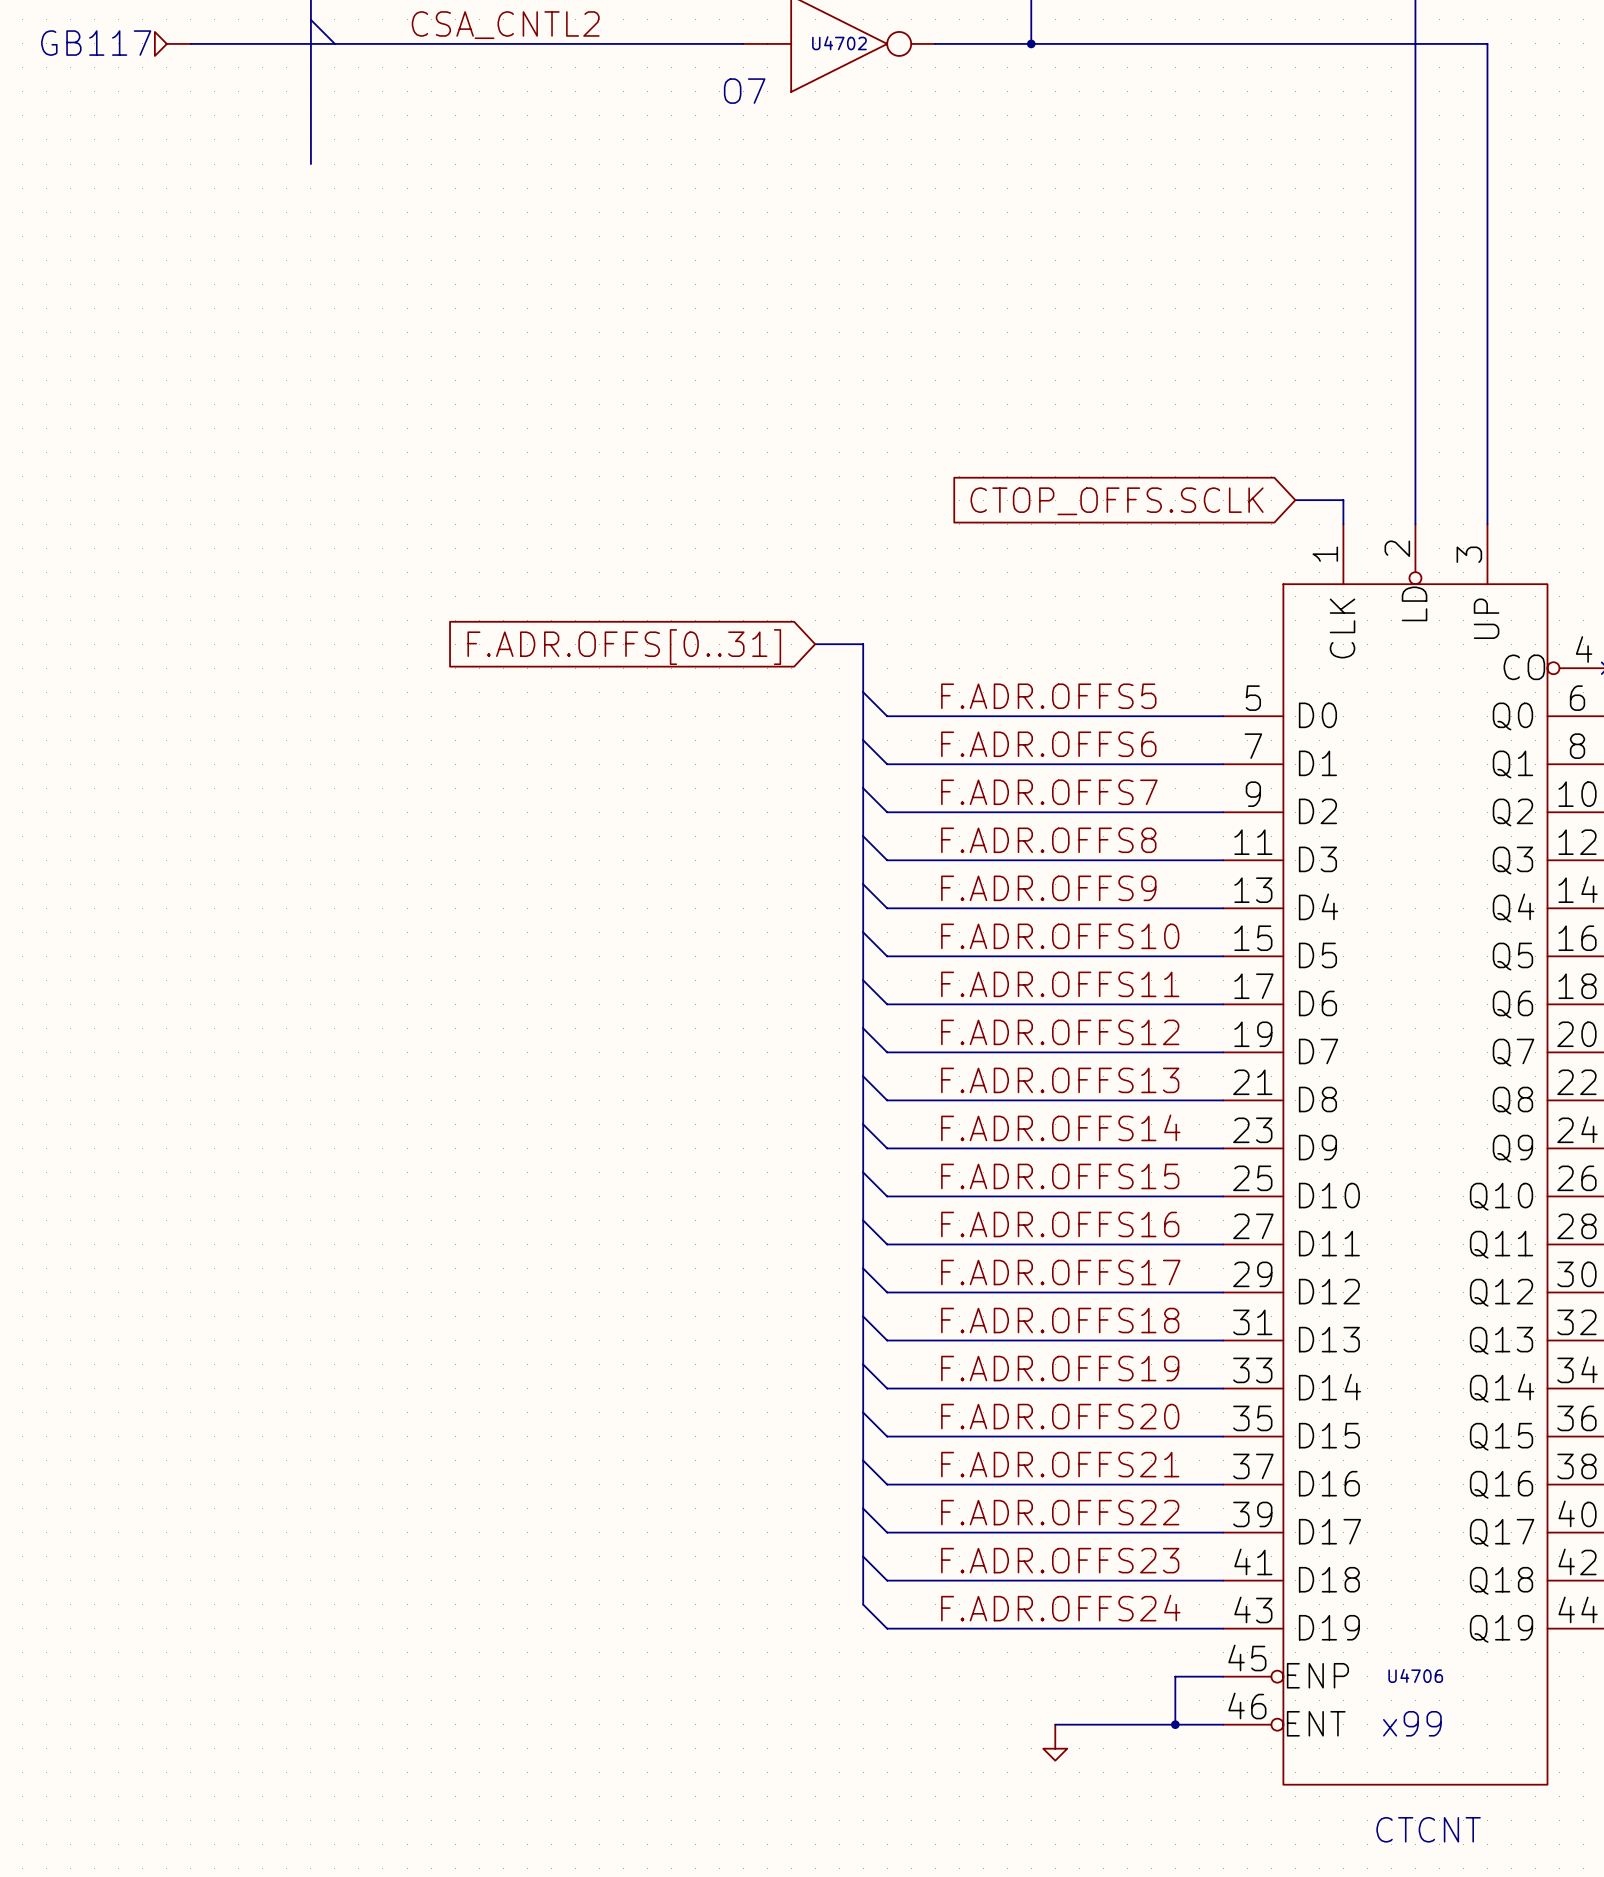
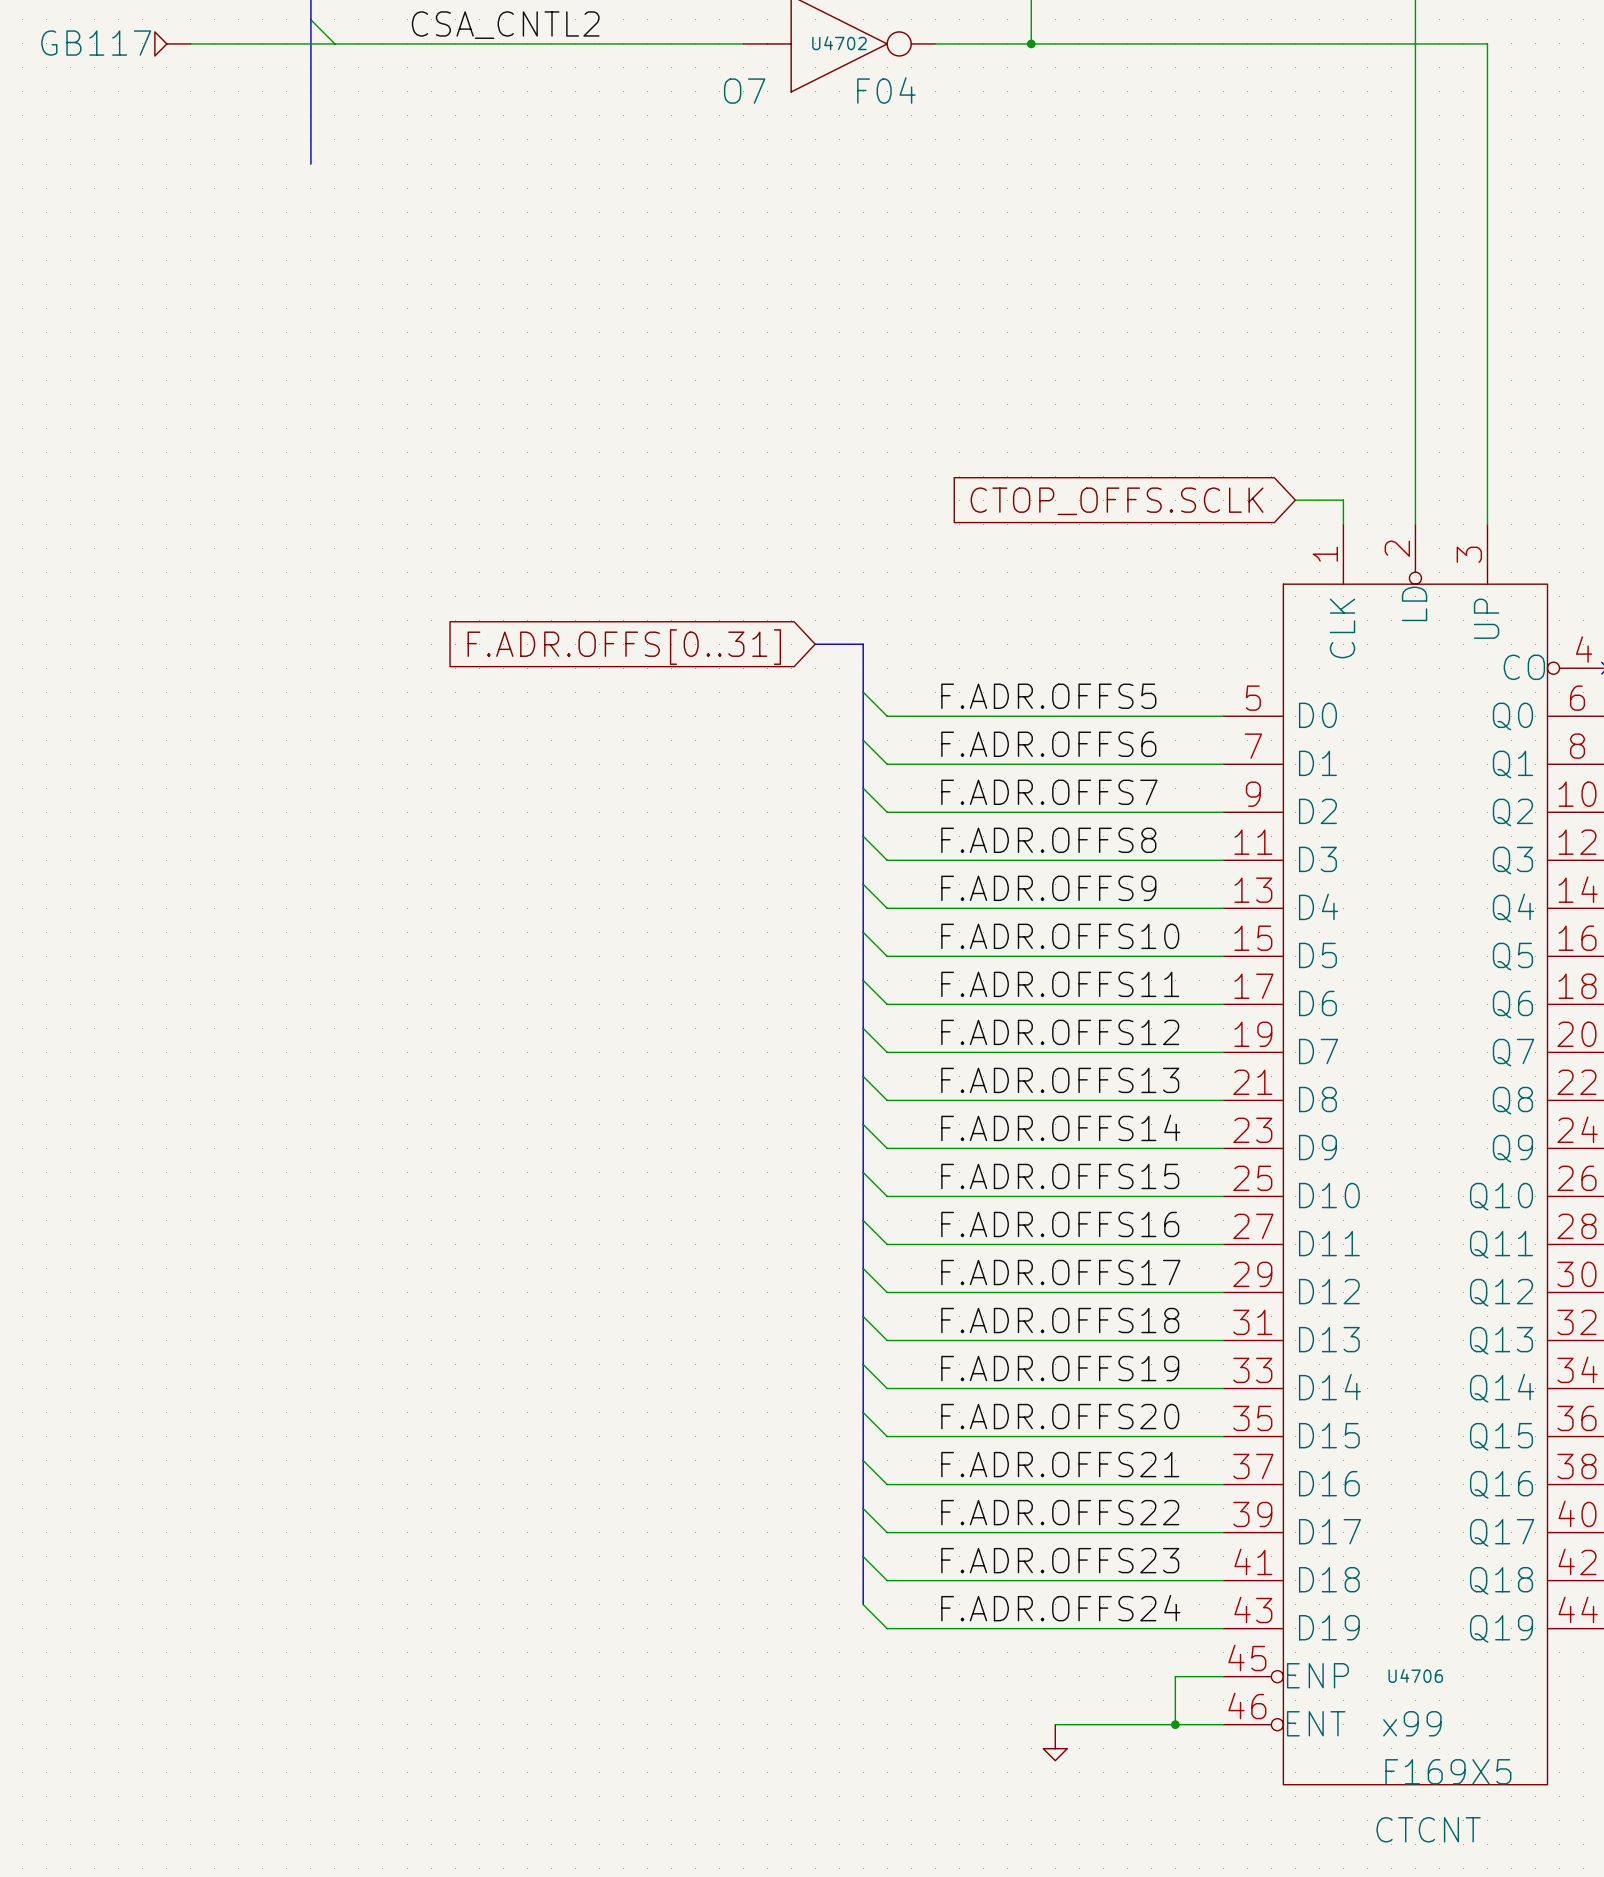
U4702 value: none -> F04 (886, 90)
U4706 value: none -> F169X5 (1448, 1771)

